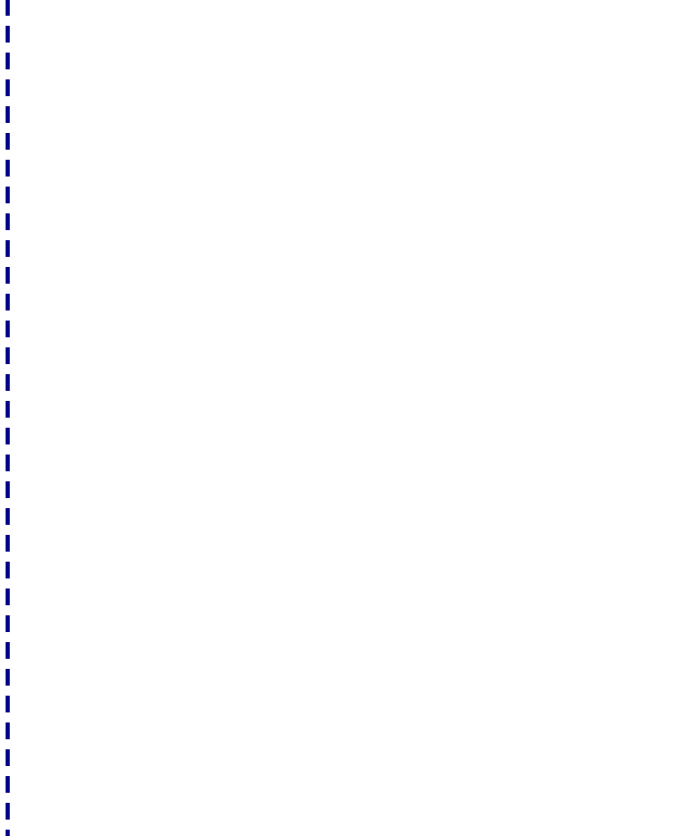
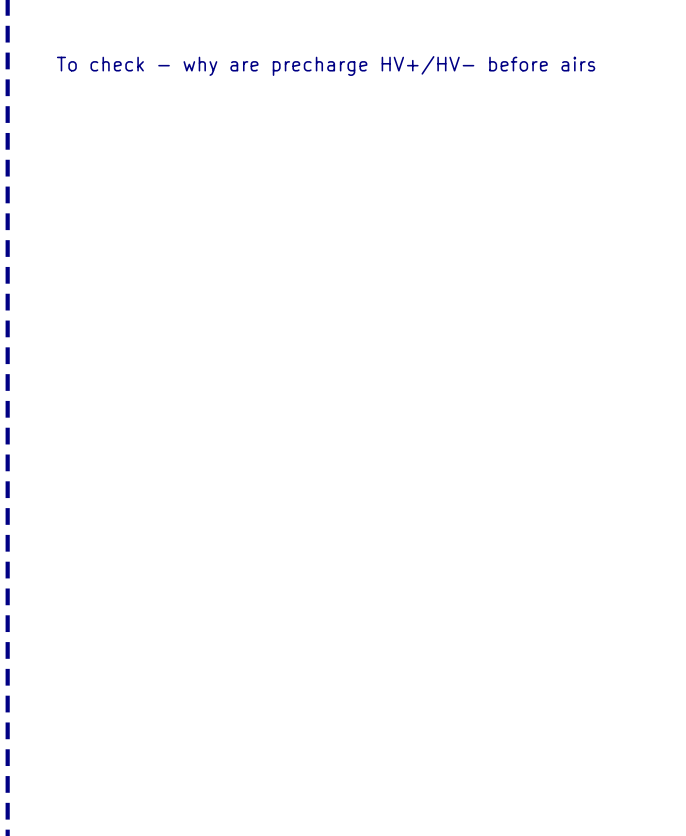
text: none -> To check - why are precharge HV+/HV- before airs (326, 65)

